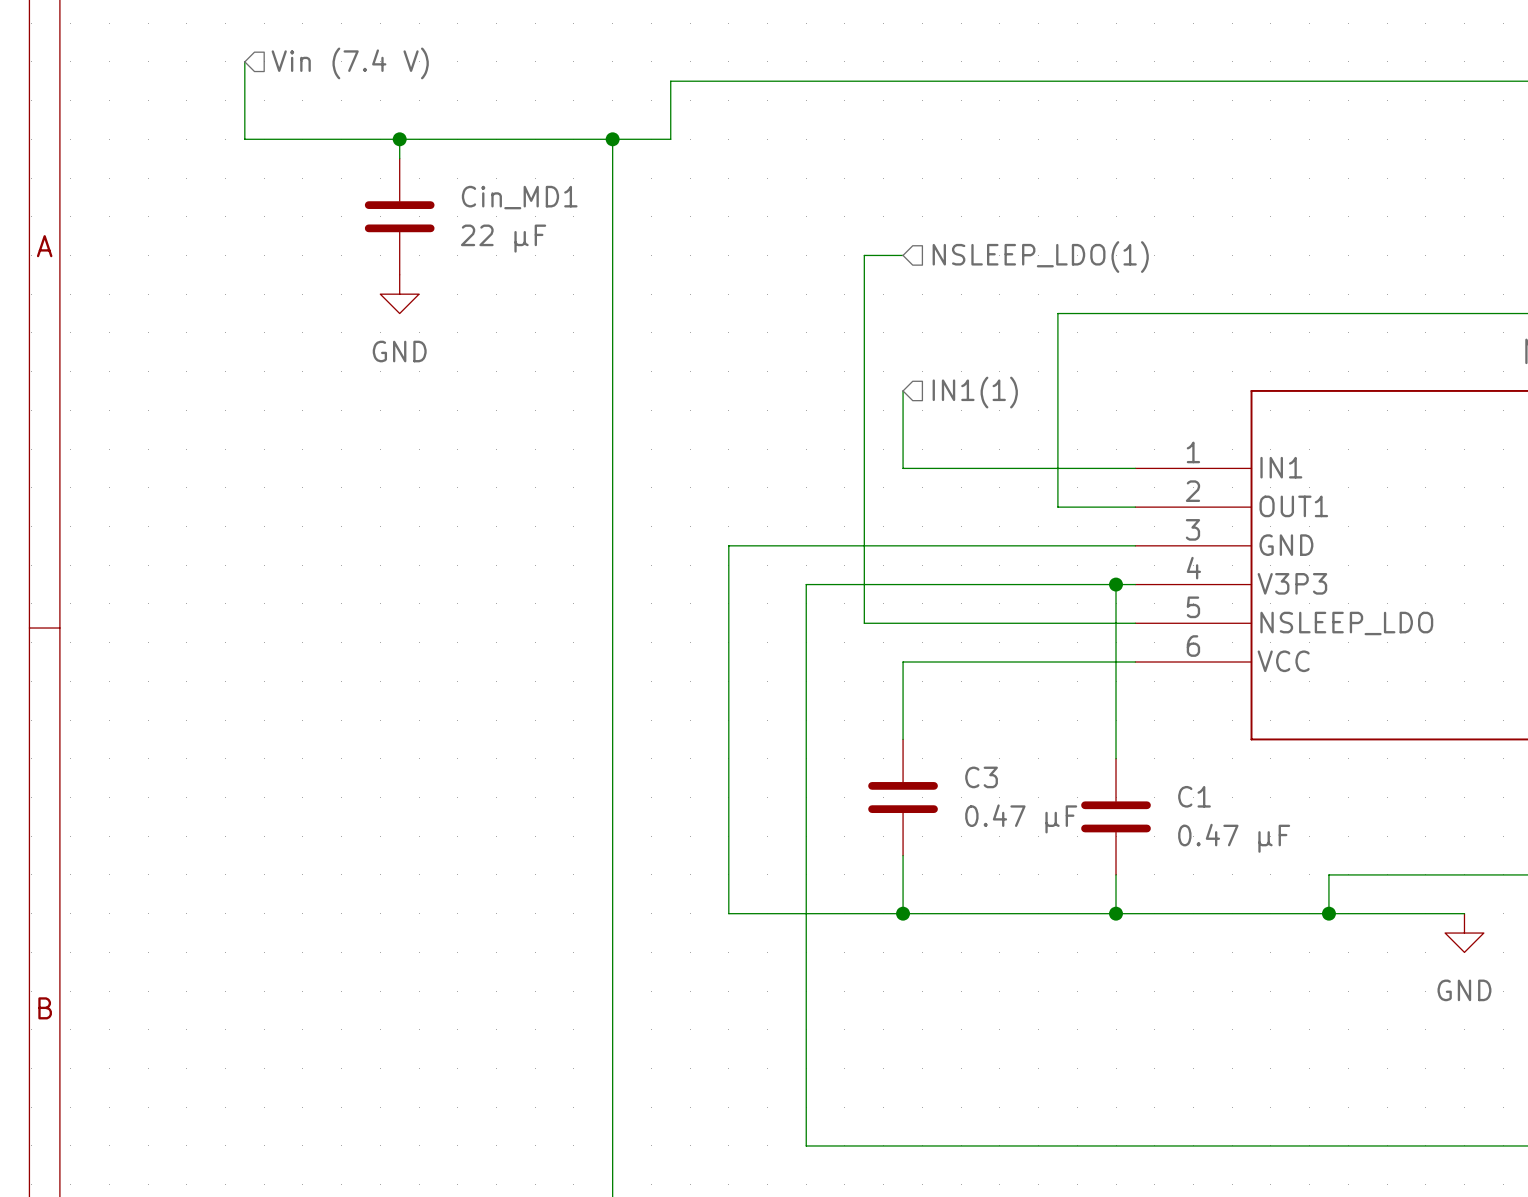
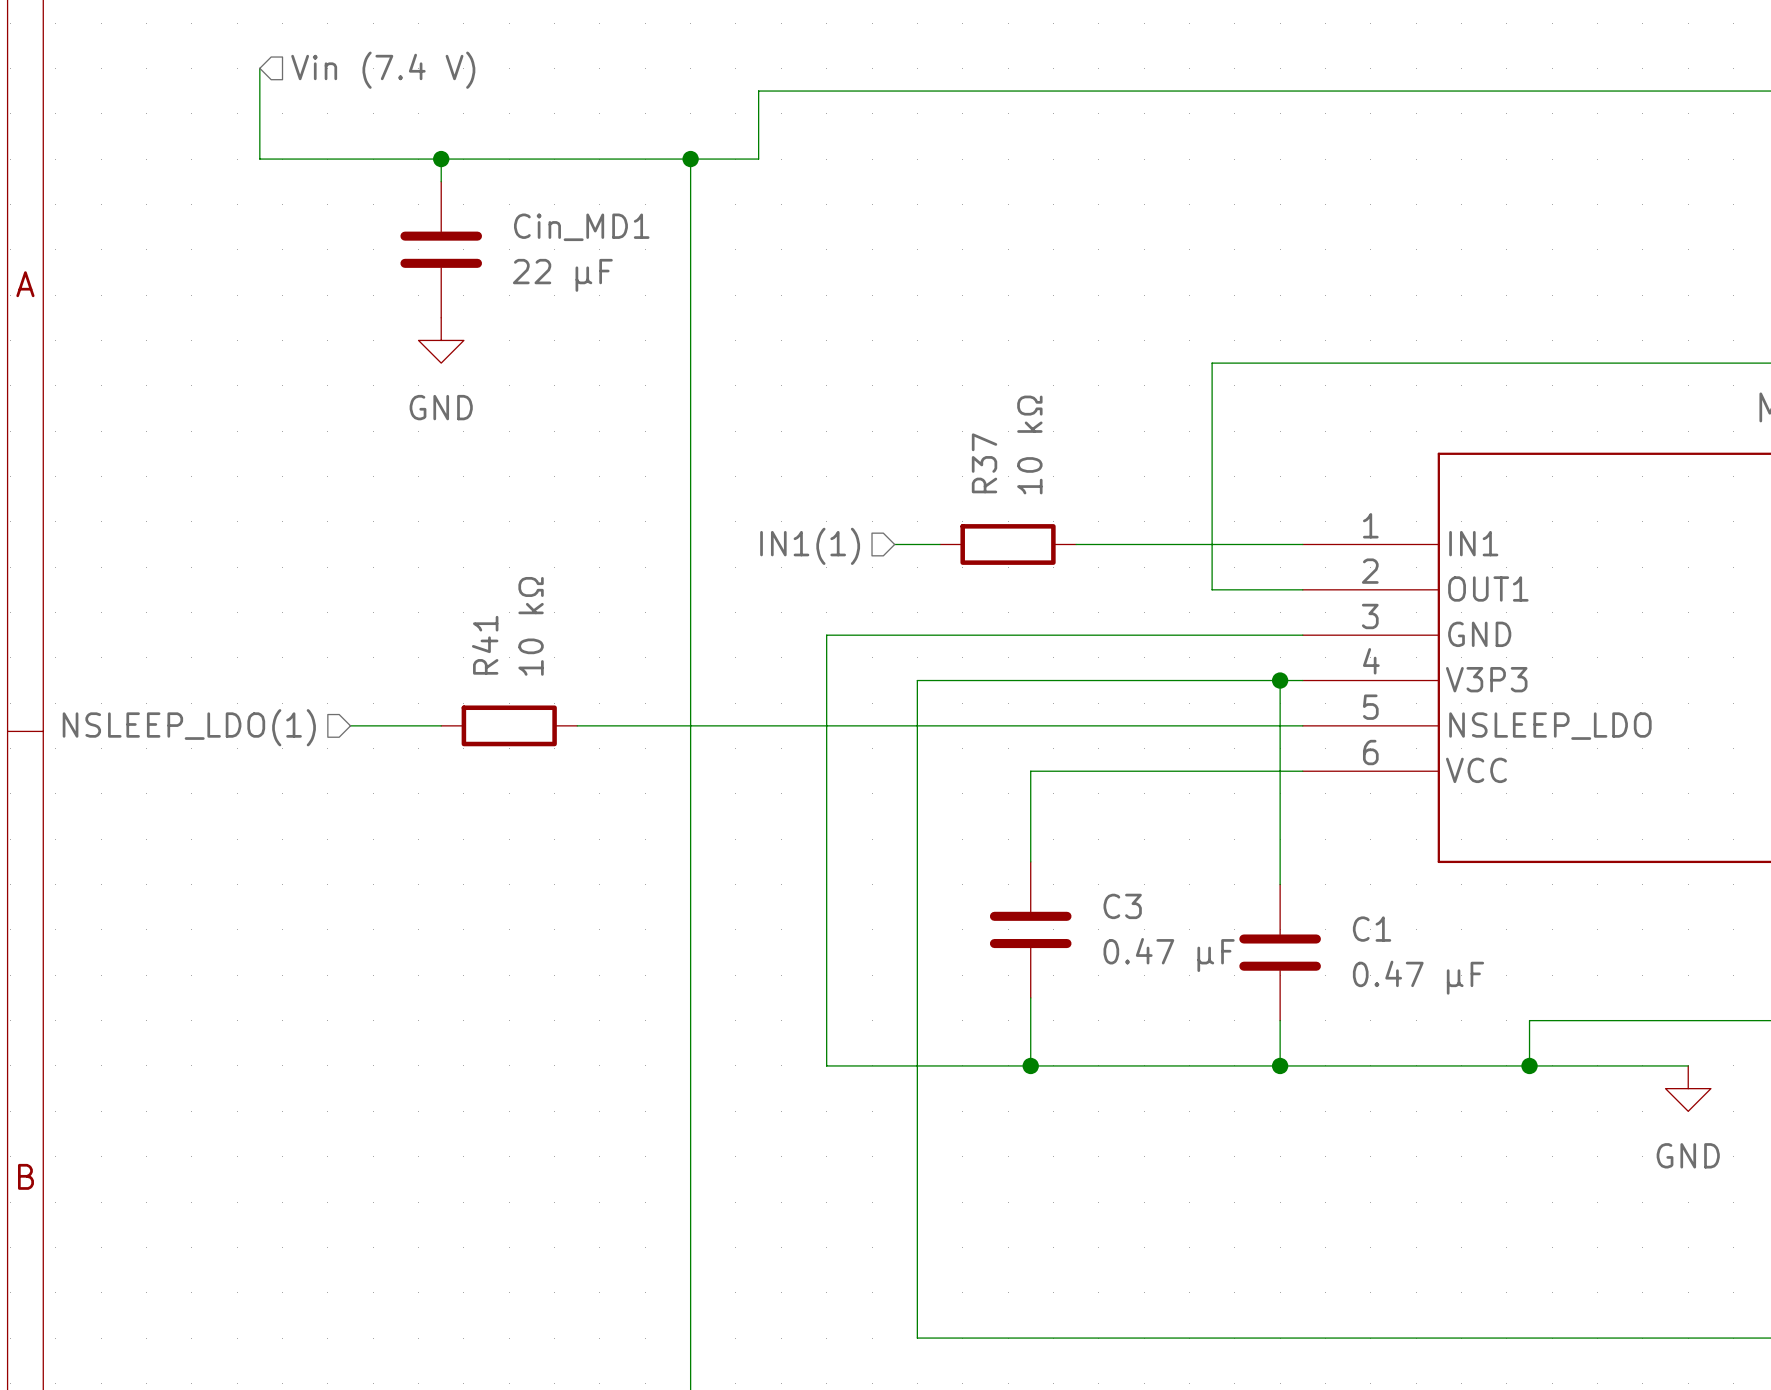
wire: (903, 255) (864, 255) (864, 623) -> (577, 725) (985, 725)
hierarchical label: NSLEEP_LDO(1) (1040, 257) -> none
wire: (903, 390) (903, 468) (941, 468) -> none
hierarchical label rotation: 0° (975, 392) -> 180° (810, 546)
hierarchical label position: IN1(1) (975, 392) -> IN1(1) (810, 546)
wire: none -> (894, 544) (940, 544)
R37: none -> 10 kΩ (1008, 544)
wire: none -> (350, 725) (441, 725)
R41: none -> 10 kΩ (509, 725)
hierarchical label: none -> NSLEEP_LDO(1) (189, 727)

